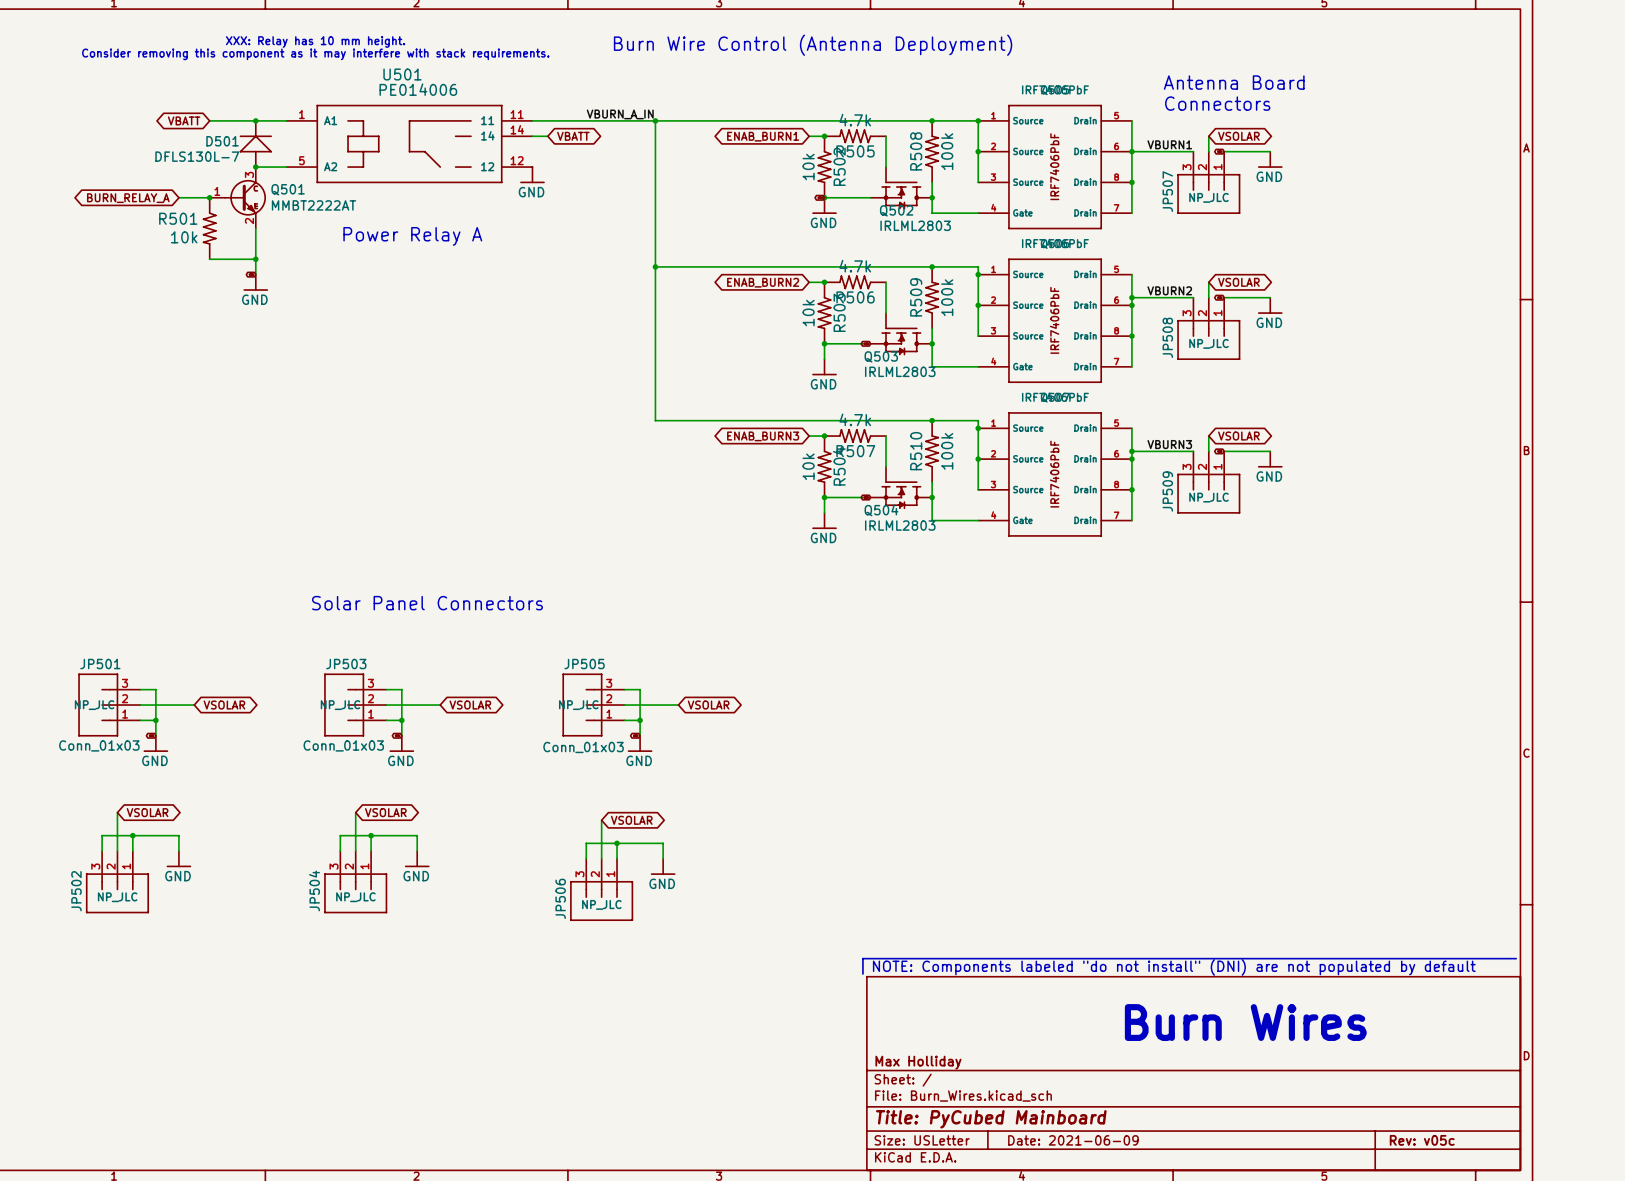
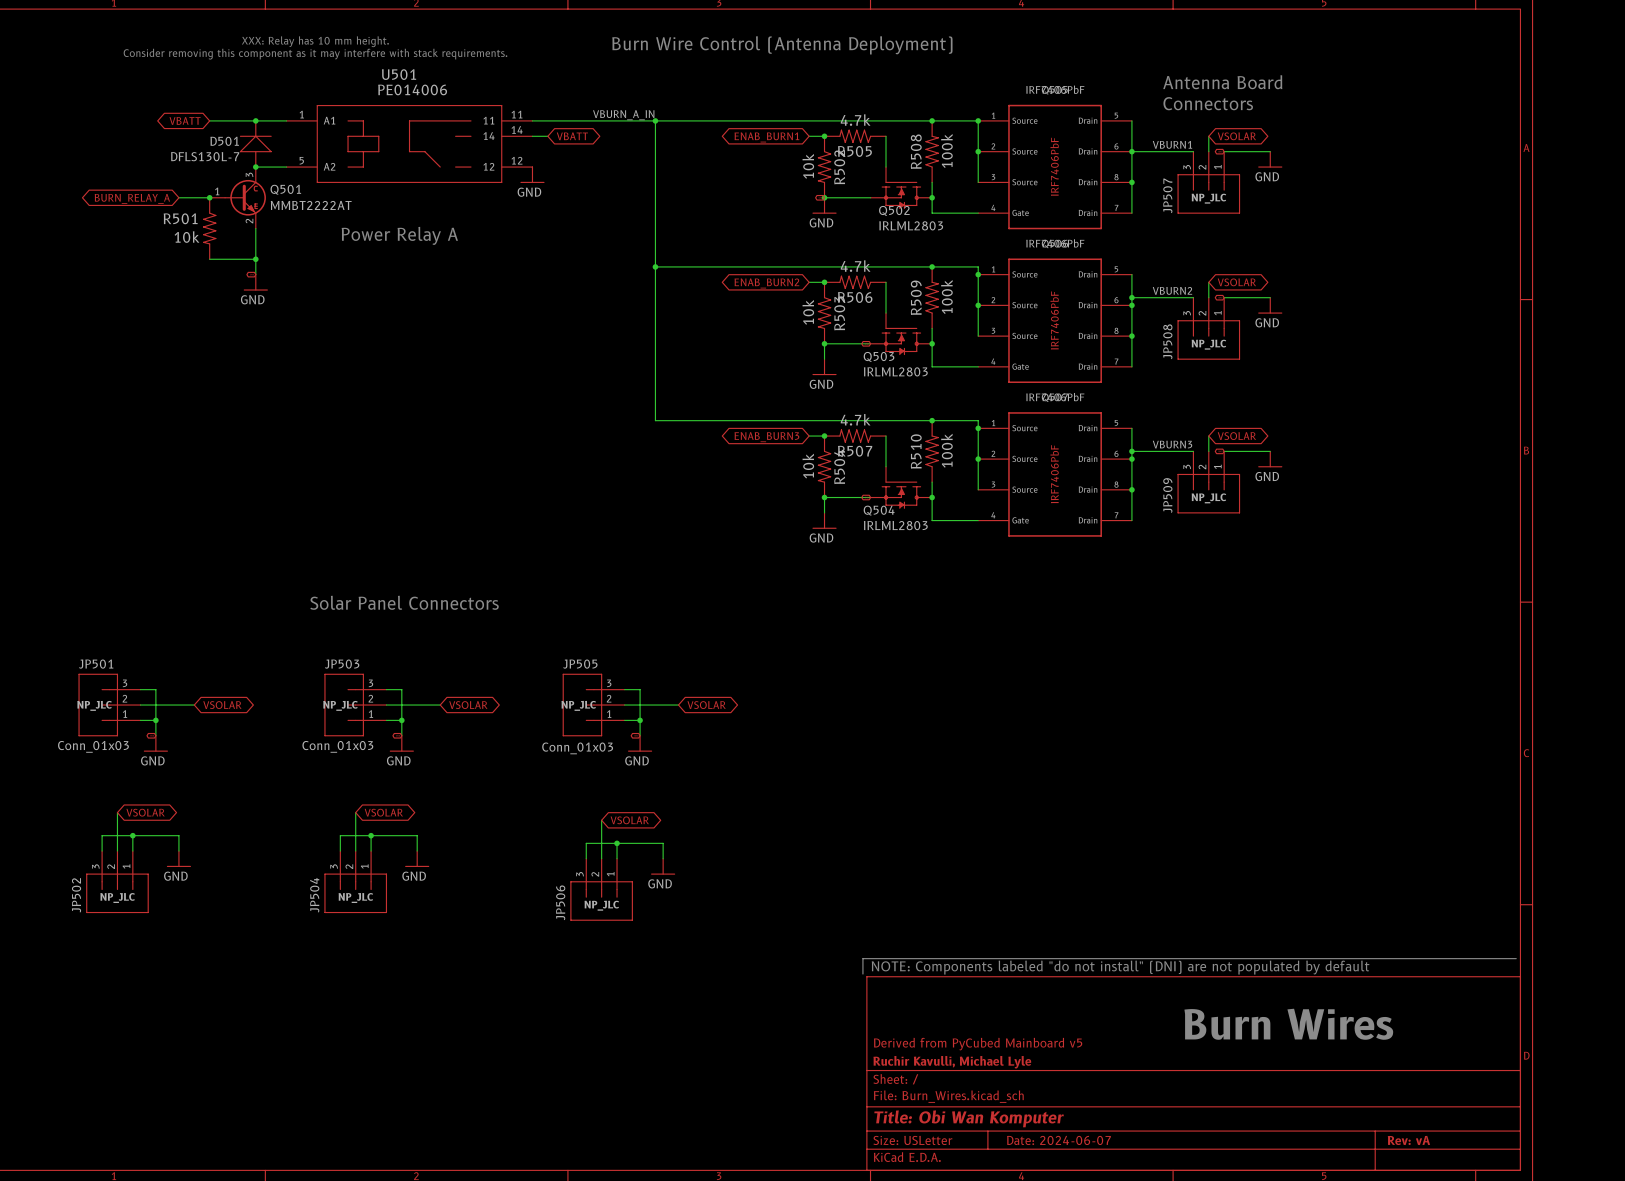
text position: Burn Wires (1245, 1022) -> Burn Wires (1288, 1024)
title block: none -> Derived from PyCubed Mainboard v5 (978, 1044)
title block: Max Holliday (918, 1062) -> Ruchir Kavulli, Michael Lyle (952, 1062)
title block: Title: PyCubed Mainboard (991, 1119) -> Title: Obi Wan Komputer (969, 1118)
title block: Date: 2021-06-09 (1073, 1140) -> Date: 2024-06-07 (1058, 1140)
title block: Rev: v05c (1422, 1140) -> Rev: vA (1408, 1140)

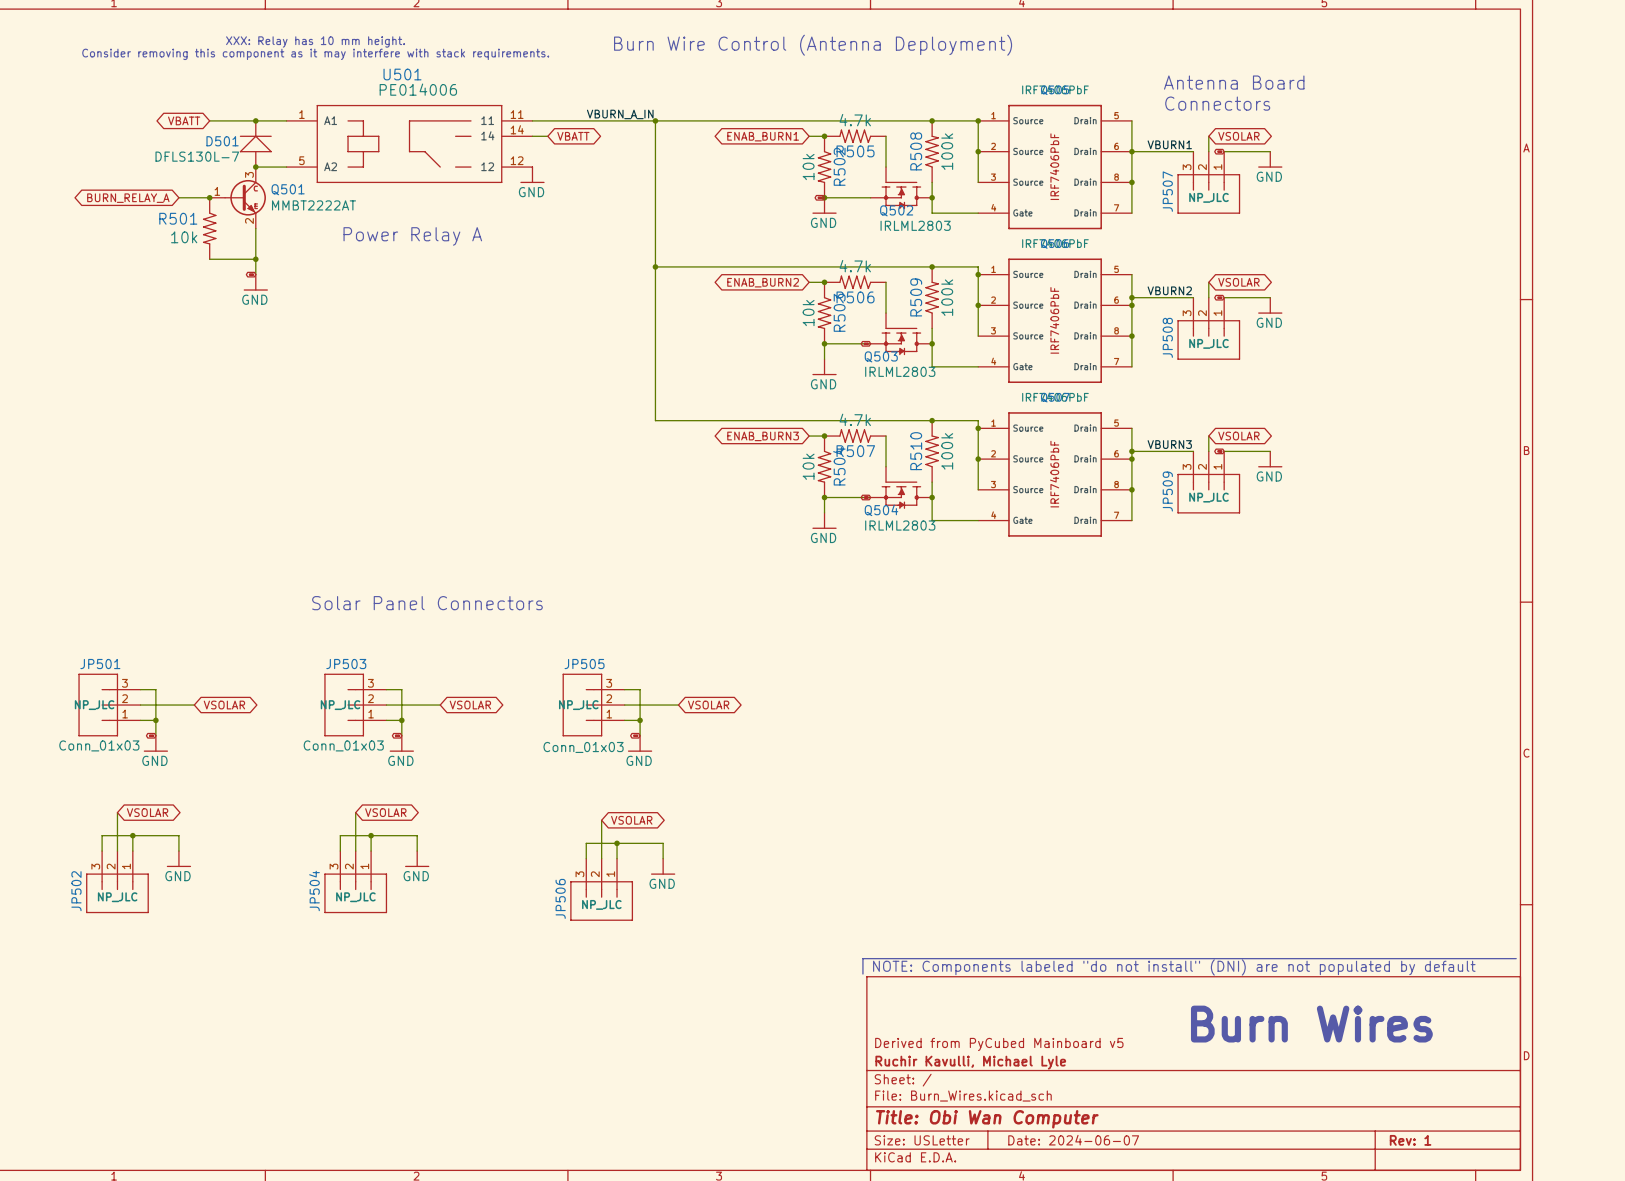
title block: Title: Obi Wan Komputer (969, 1118) -> Title: Obi Wan Computer (987, 1119)
title block: Rev: vA (1408, 1140) -> Rev: 1 (1410, 1140)

